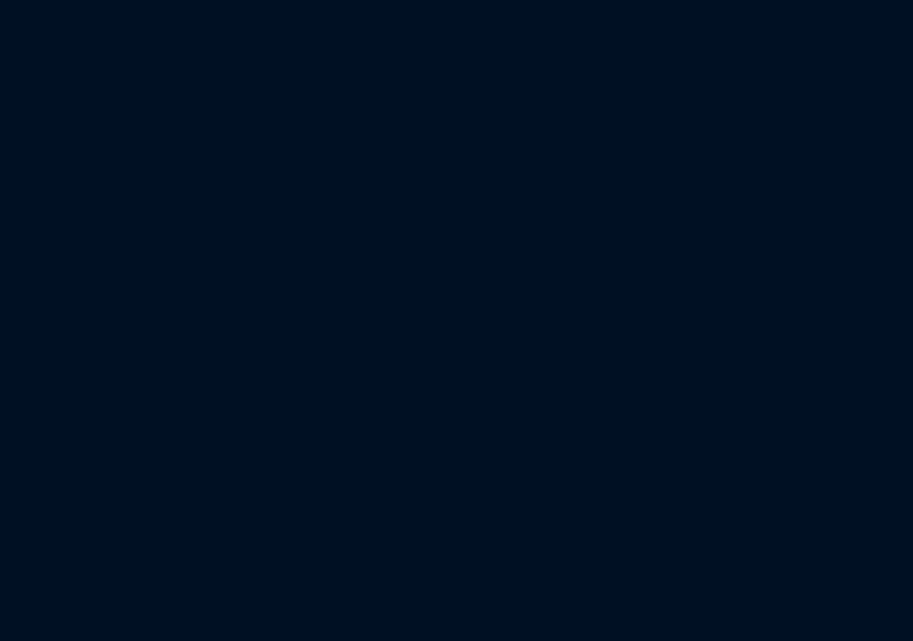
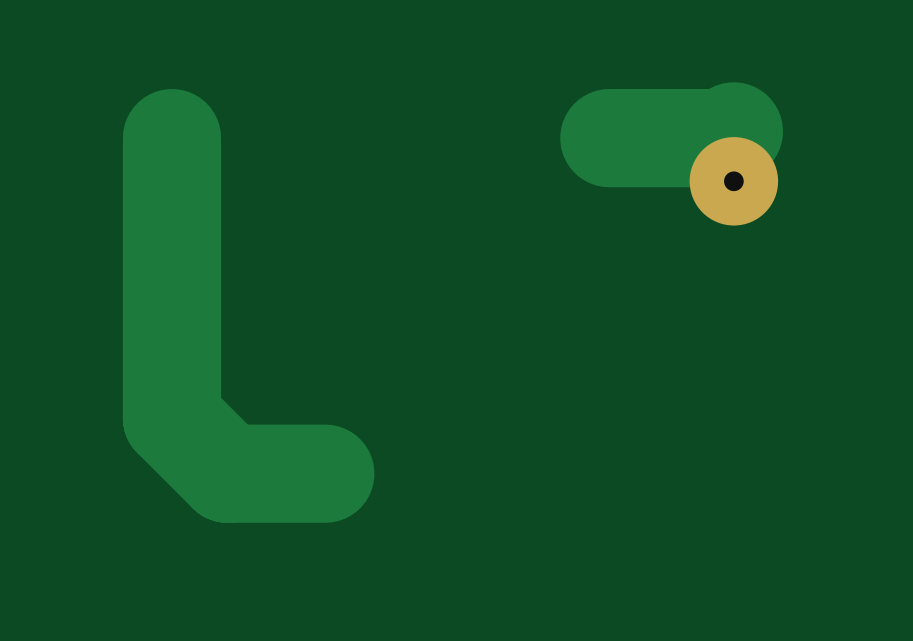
track: none -> (733, 131) (727, 138) (609, 138)
track: none -> (171, 138) (171, 418) (227, 473) (325, 473)
via: none -> (733, 181)

